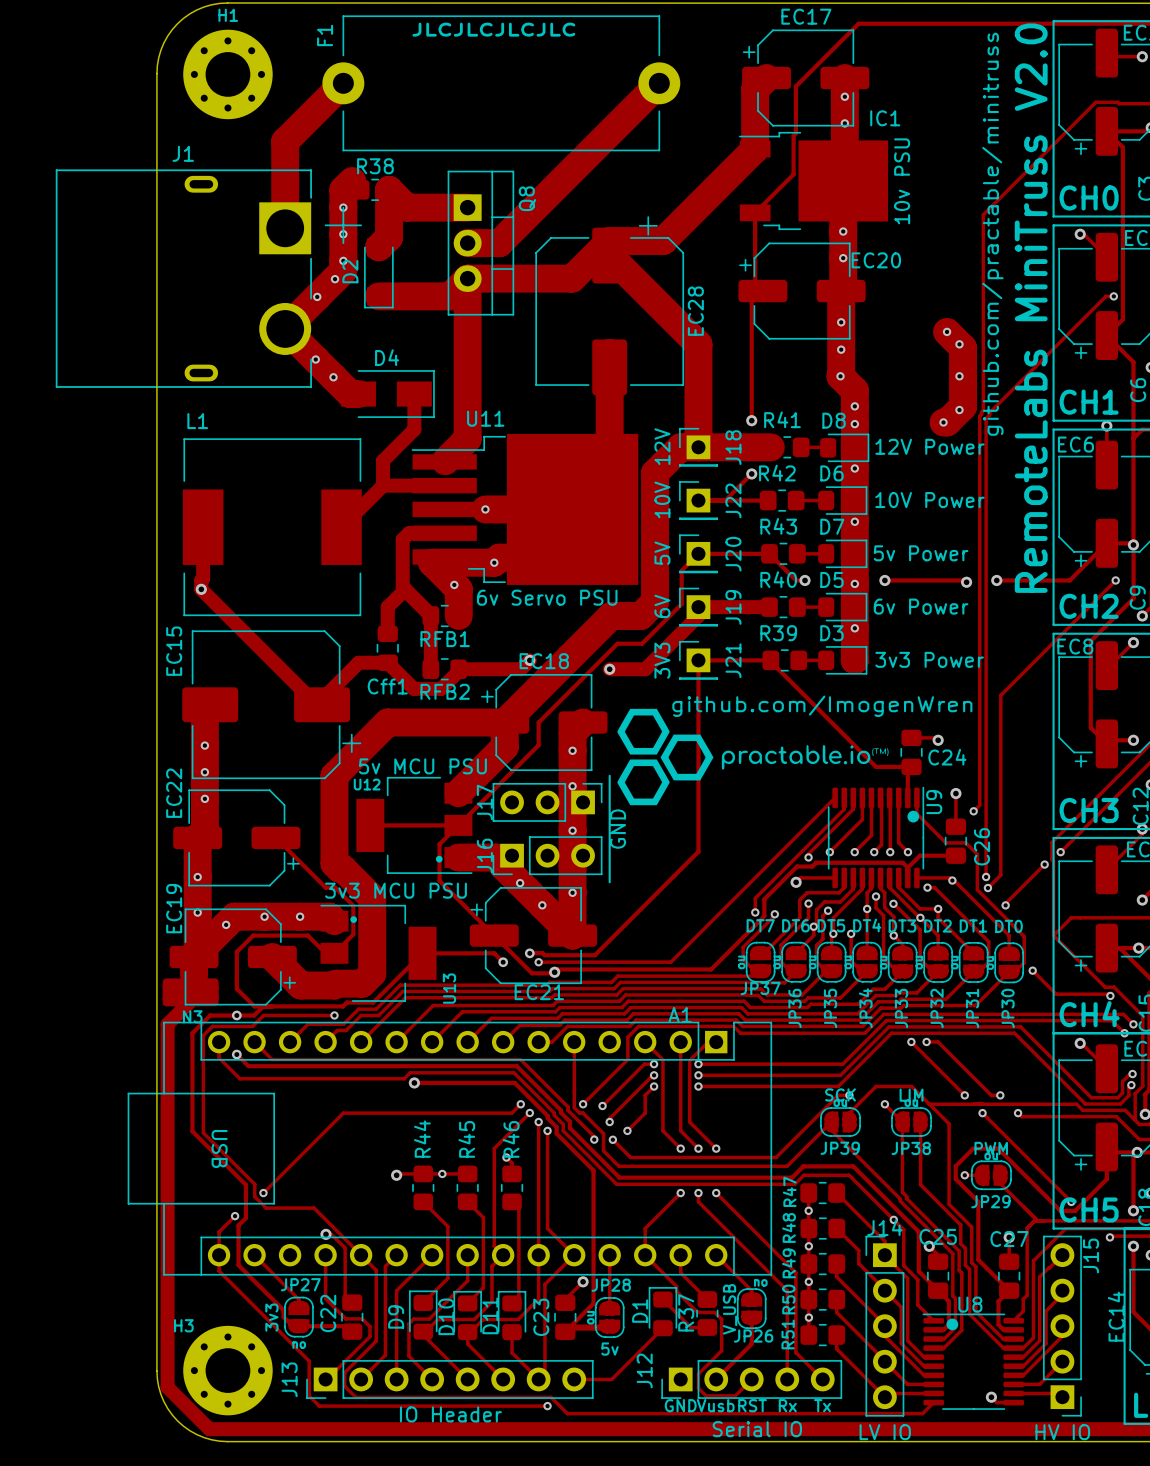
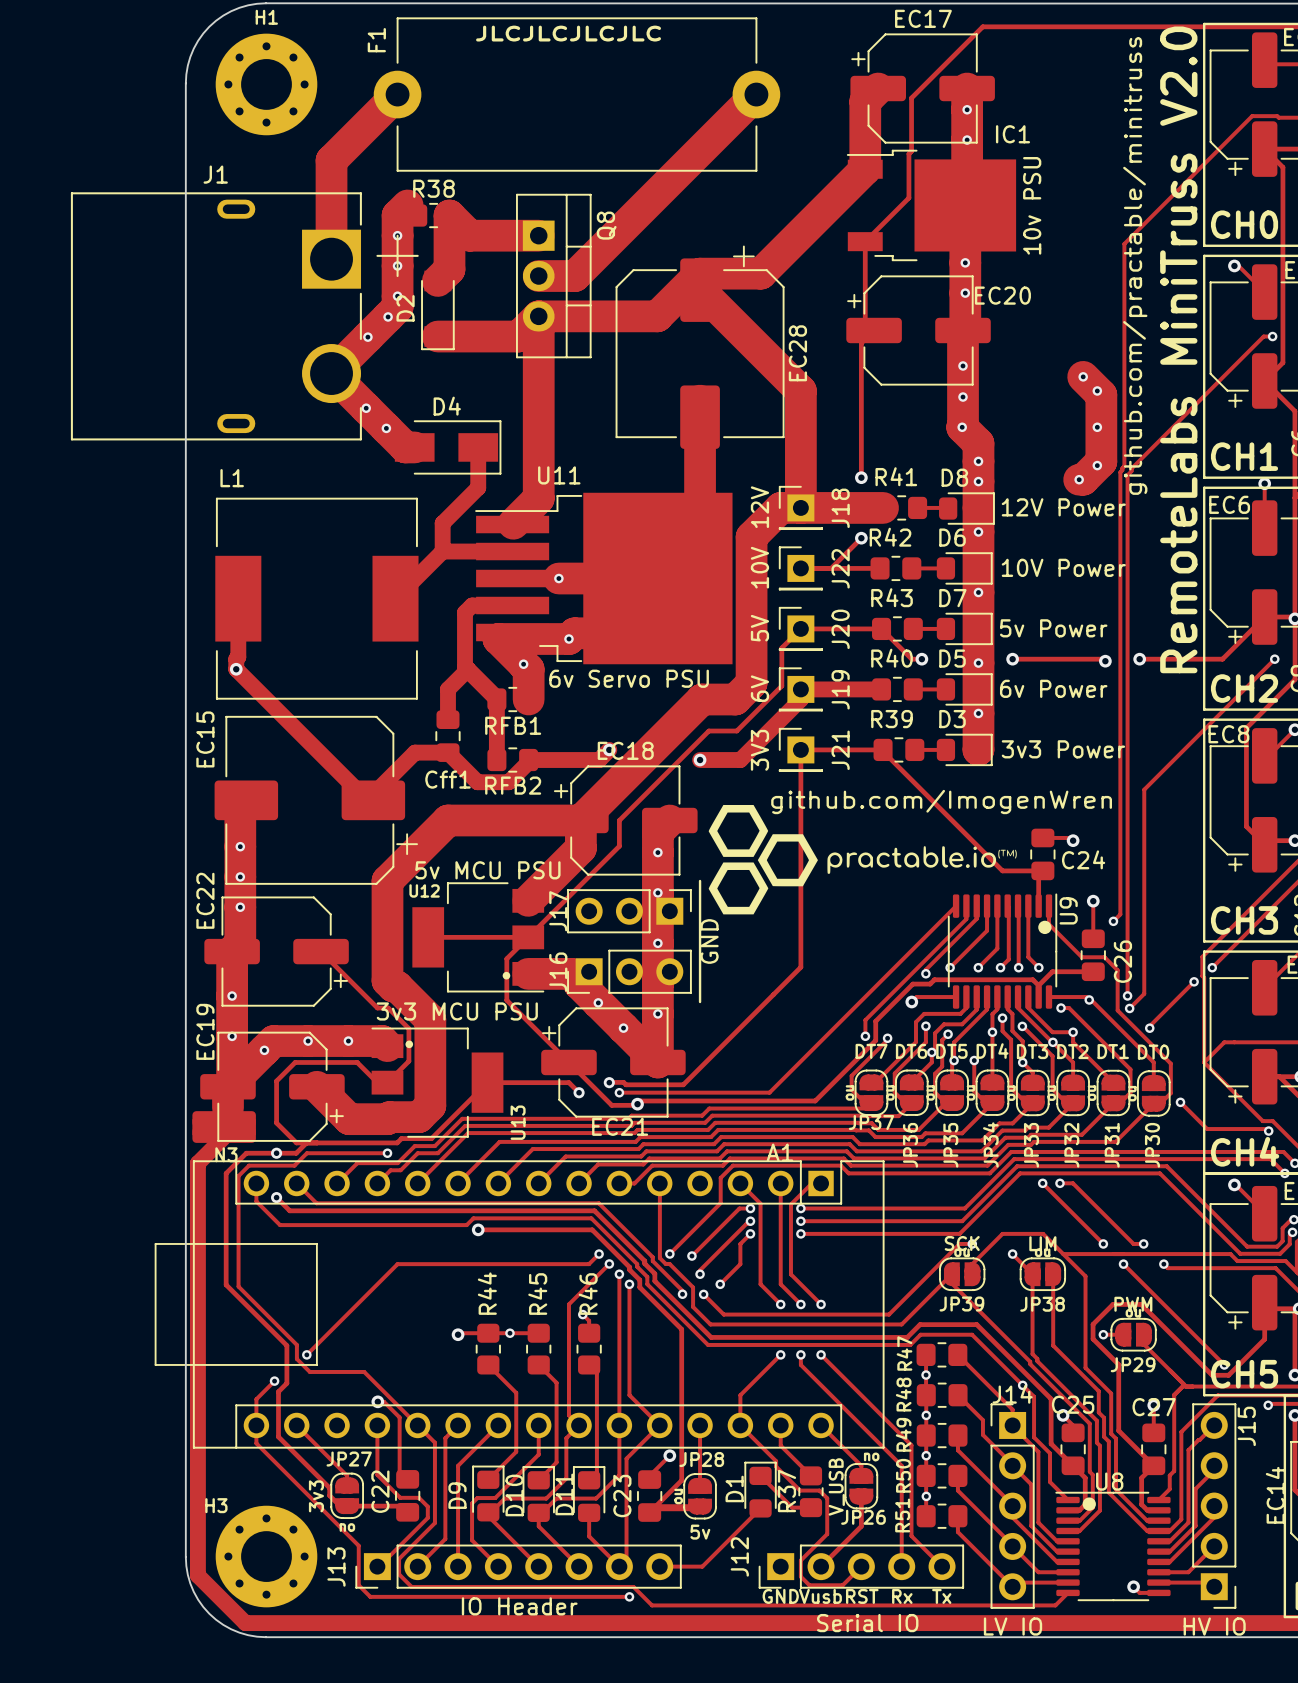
A1 footprint: [127, 1021, 773, 1276] -> [154, 1160, 885, 1449]

